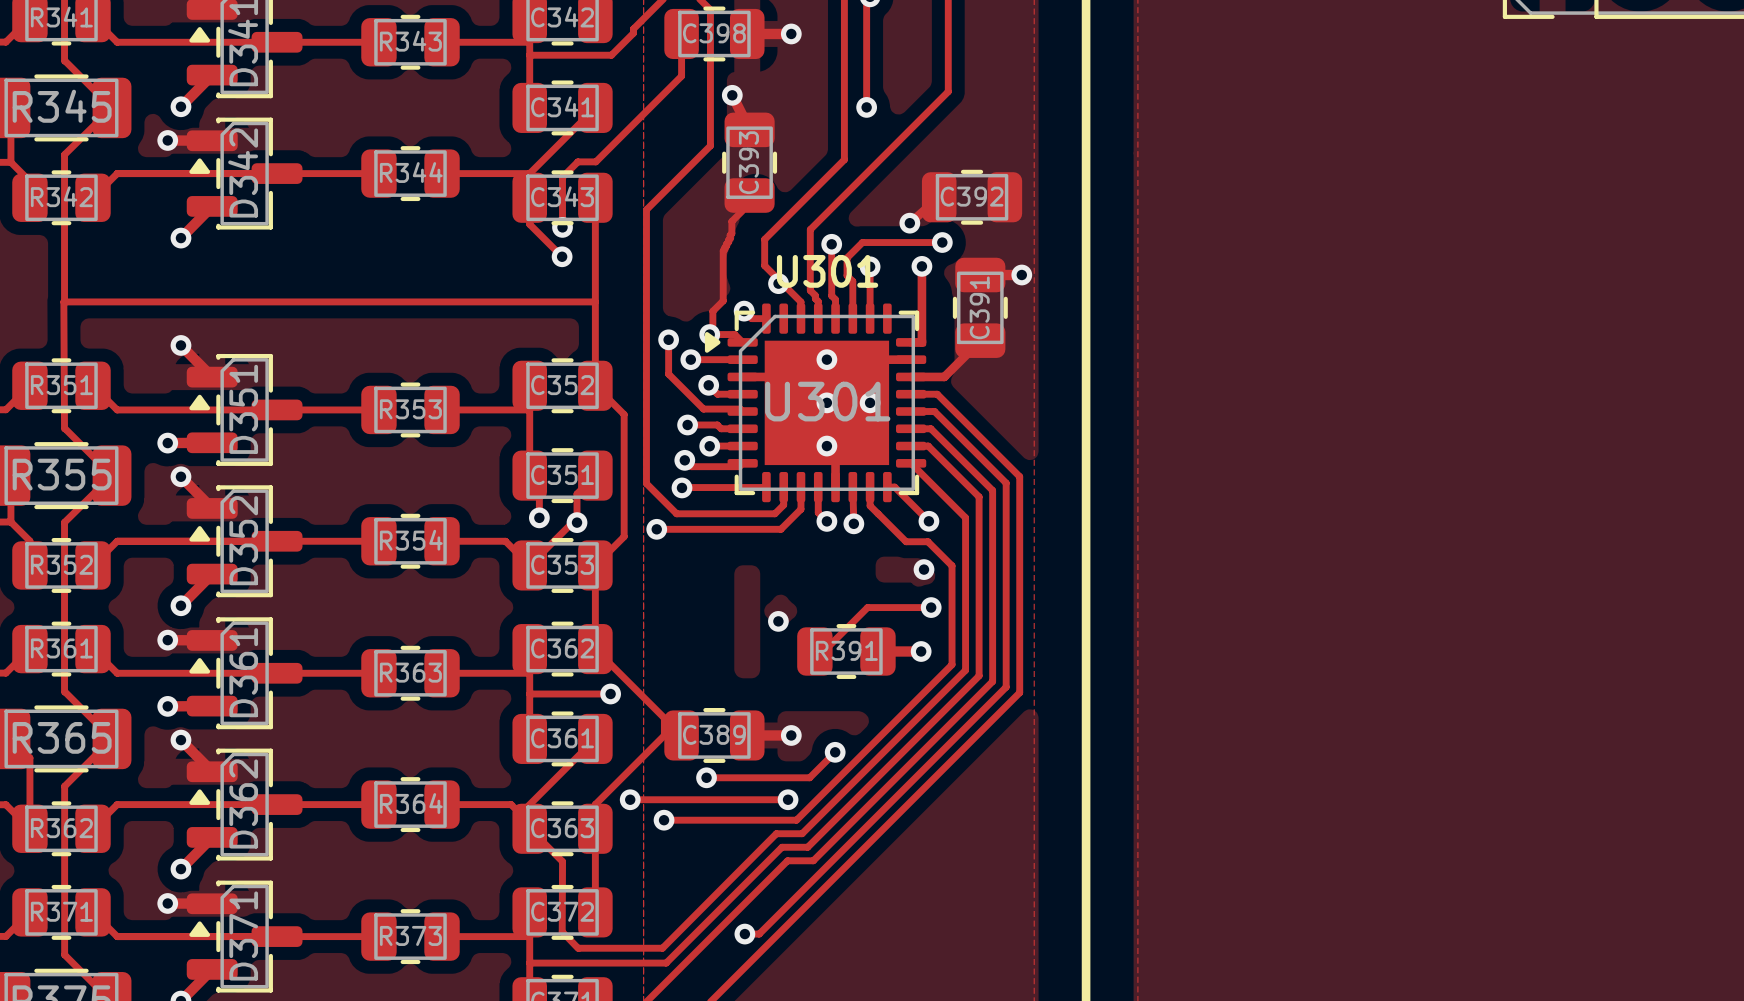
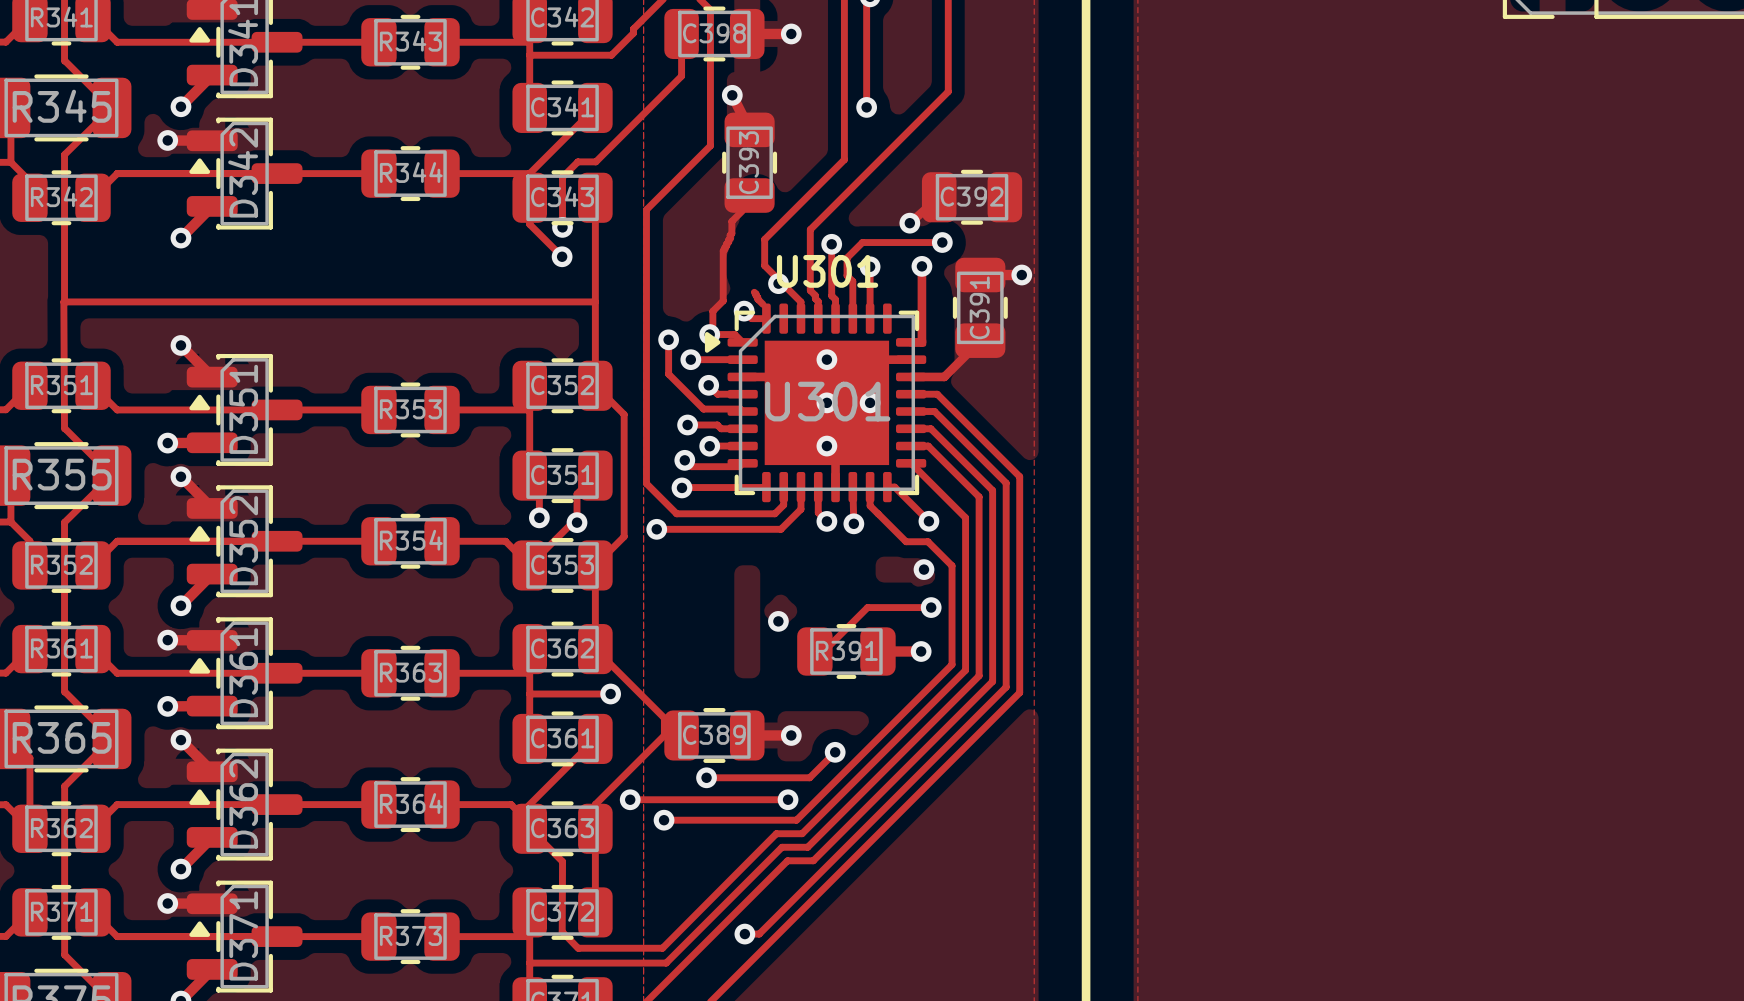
track: none -> (754, 292) (762, 304)

